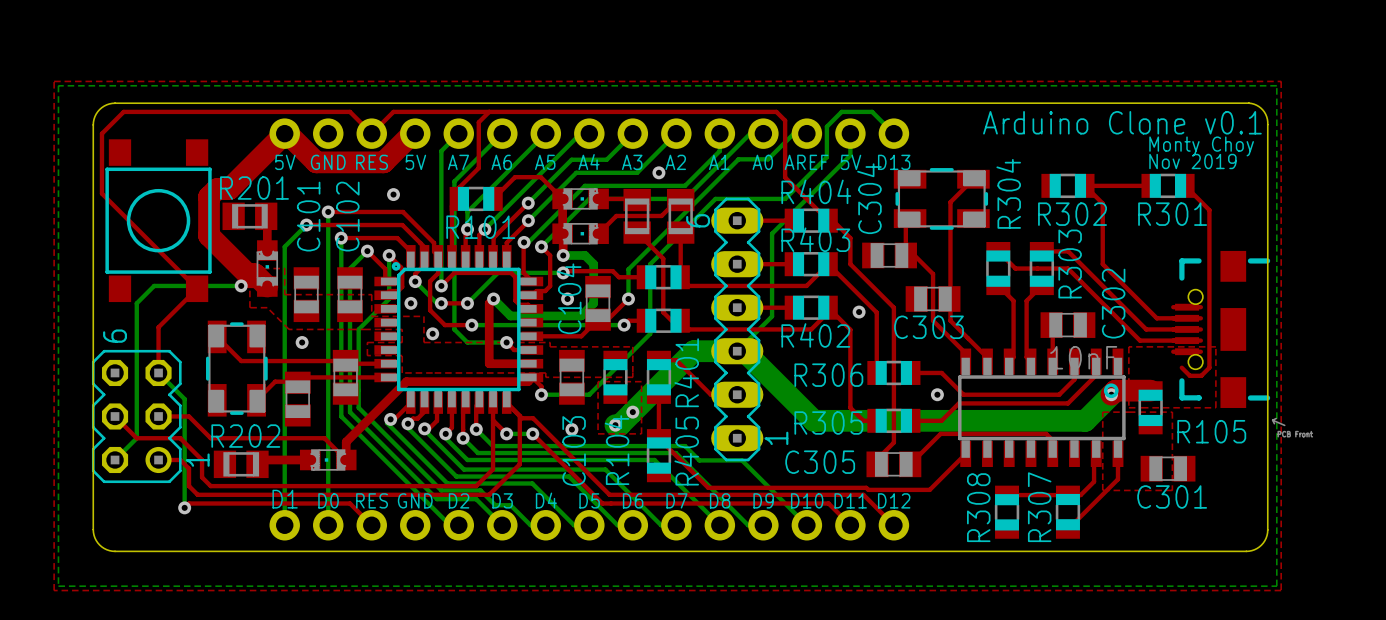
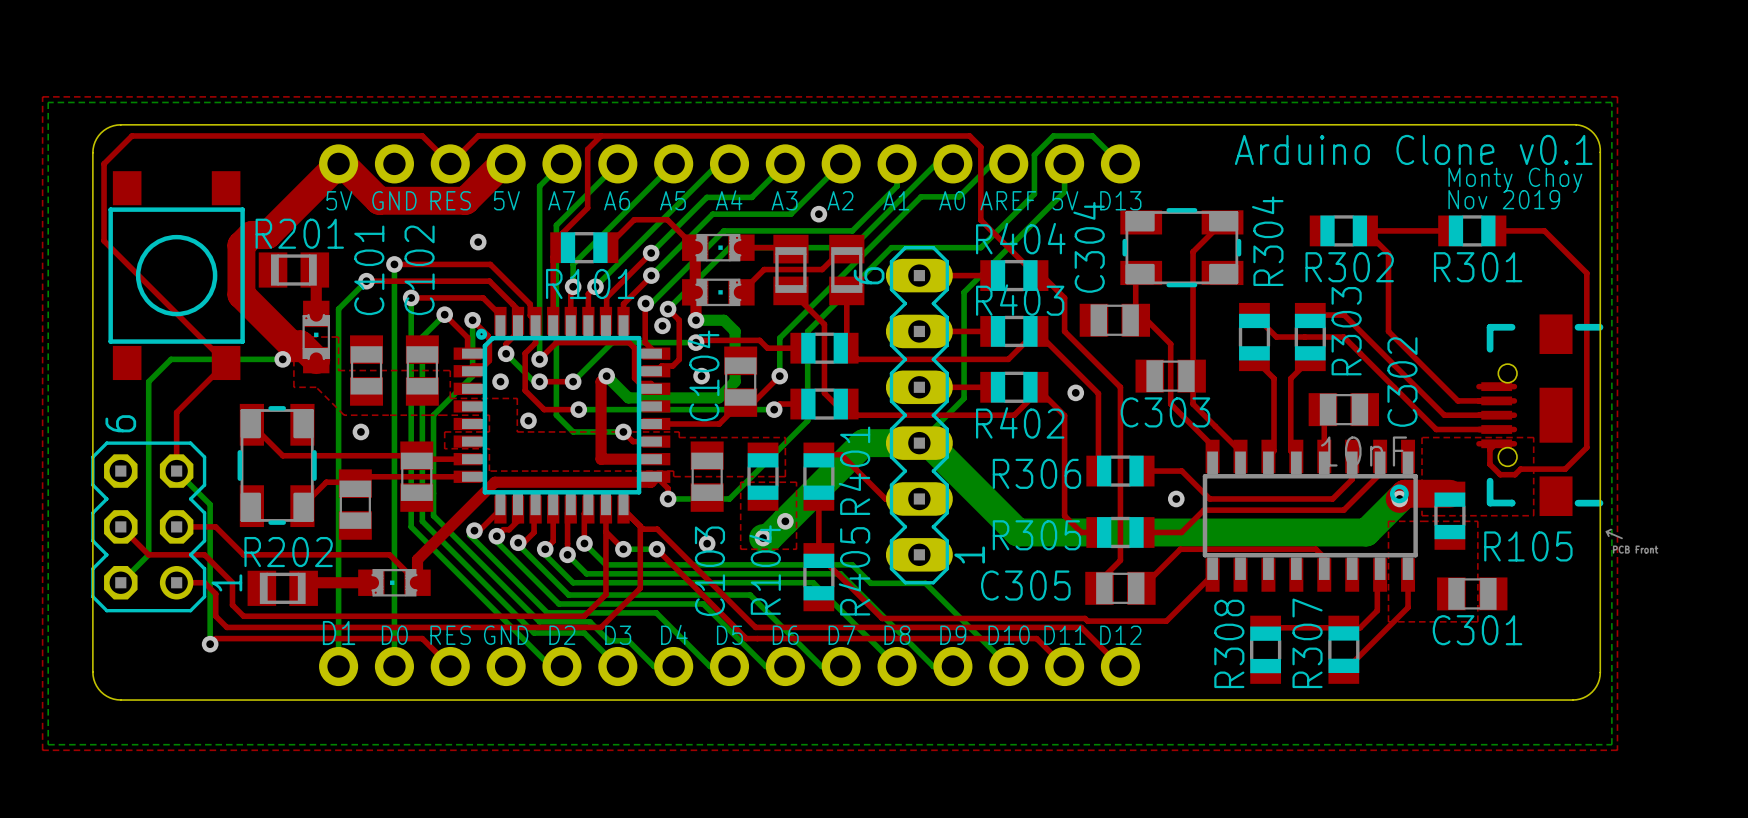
top track: (1185, 185) (1209, 210) (1209, 367) (1205, 371) -> (1494, 230) (1544, 230) (1586, 273) (1586, 447) (1565, 469) (1520, 469)
via: none -> (662, 325)
top track: none -> (1496, 443) (1489, 449) (1489, 464)

